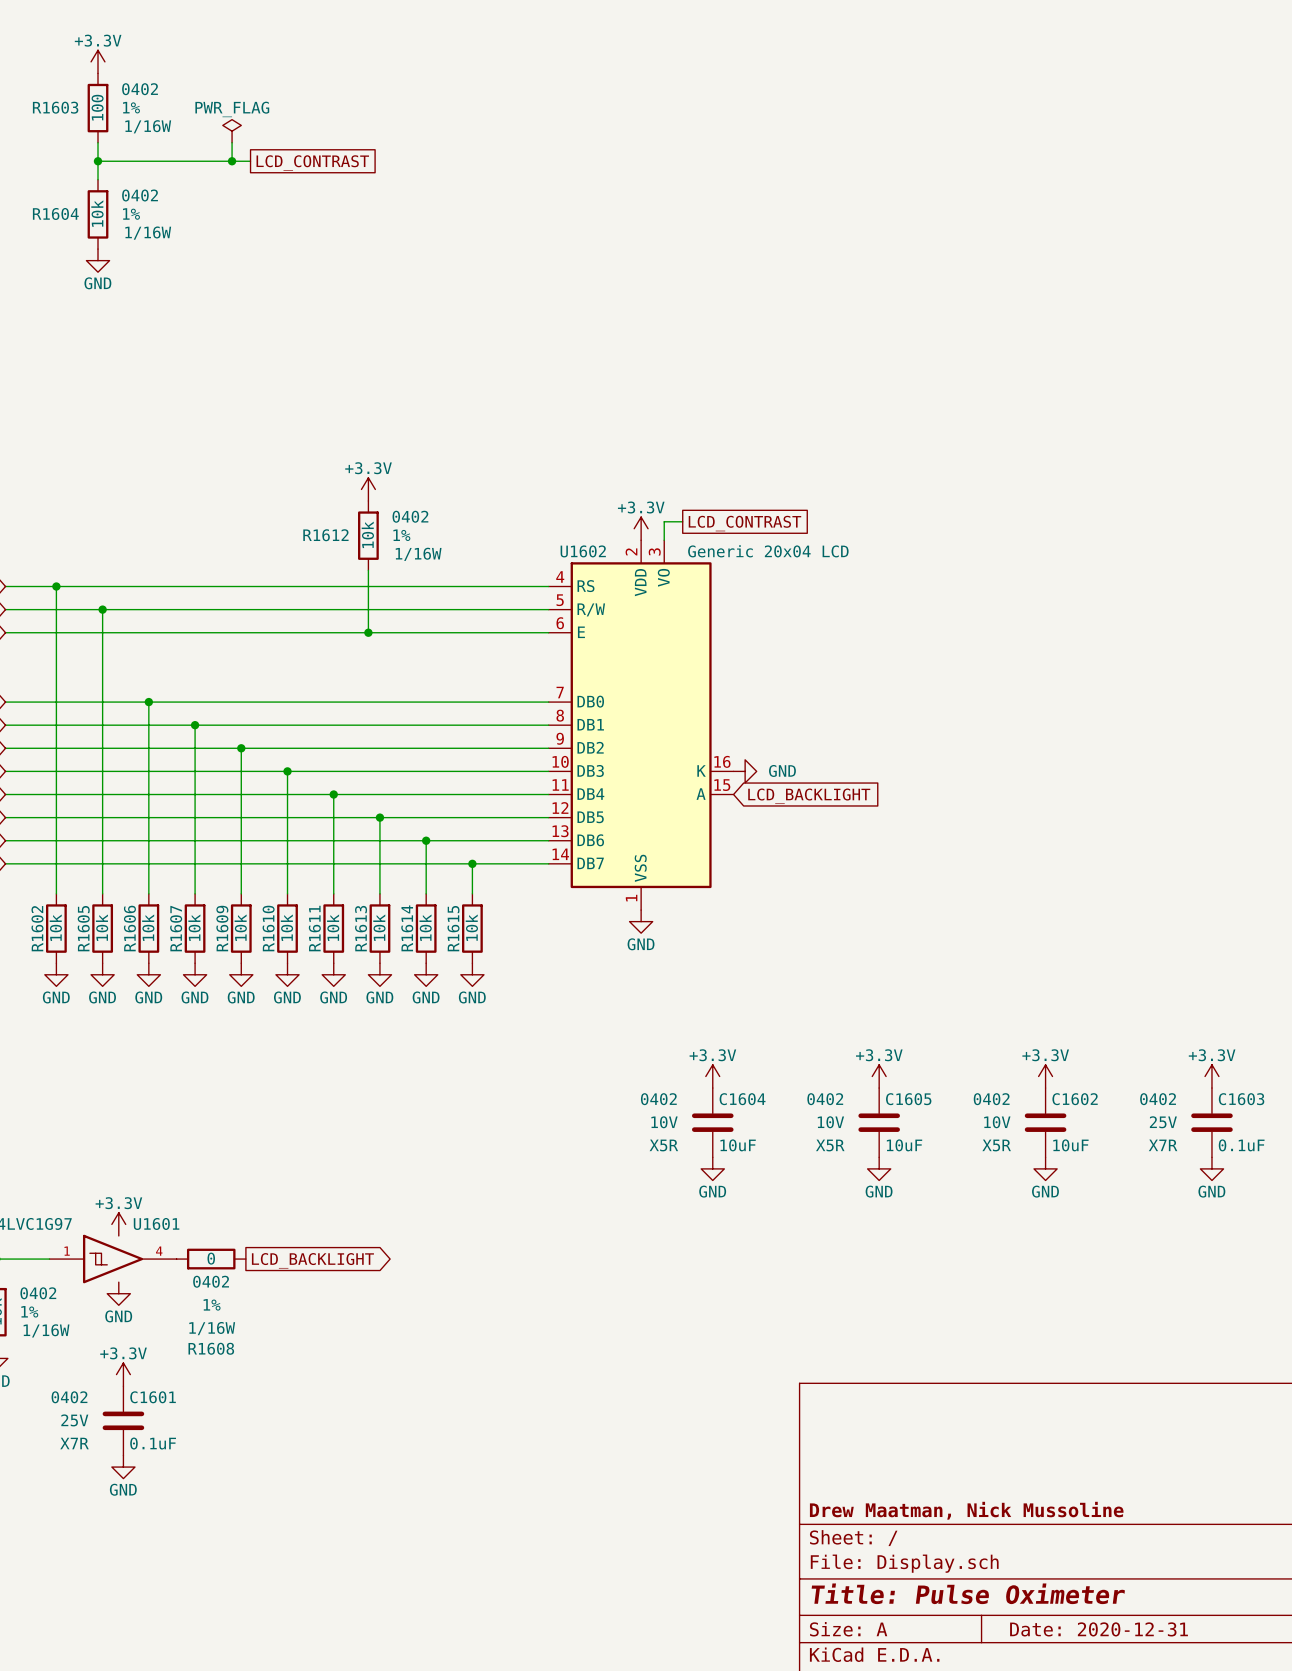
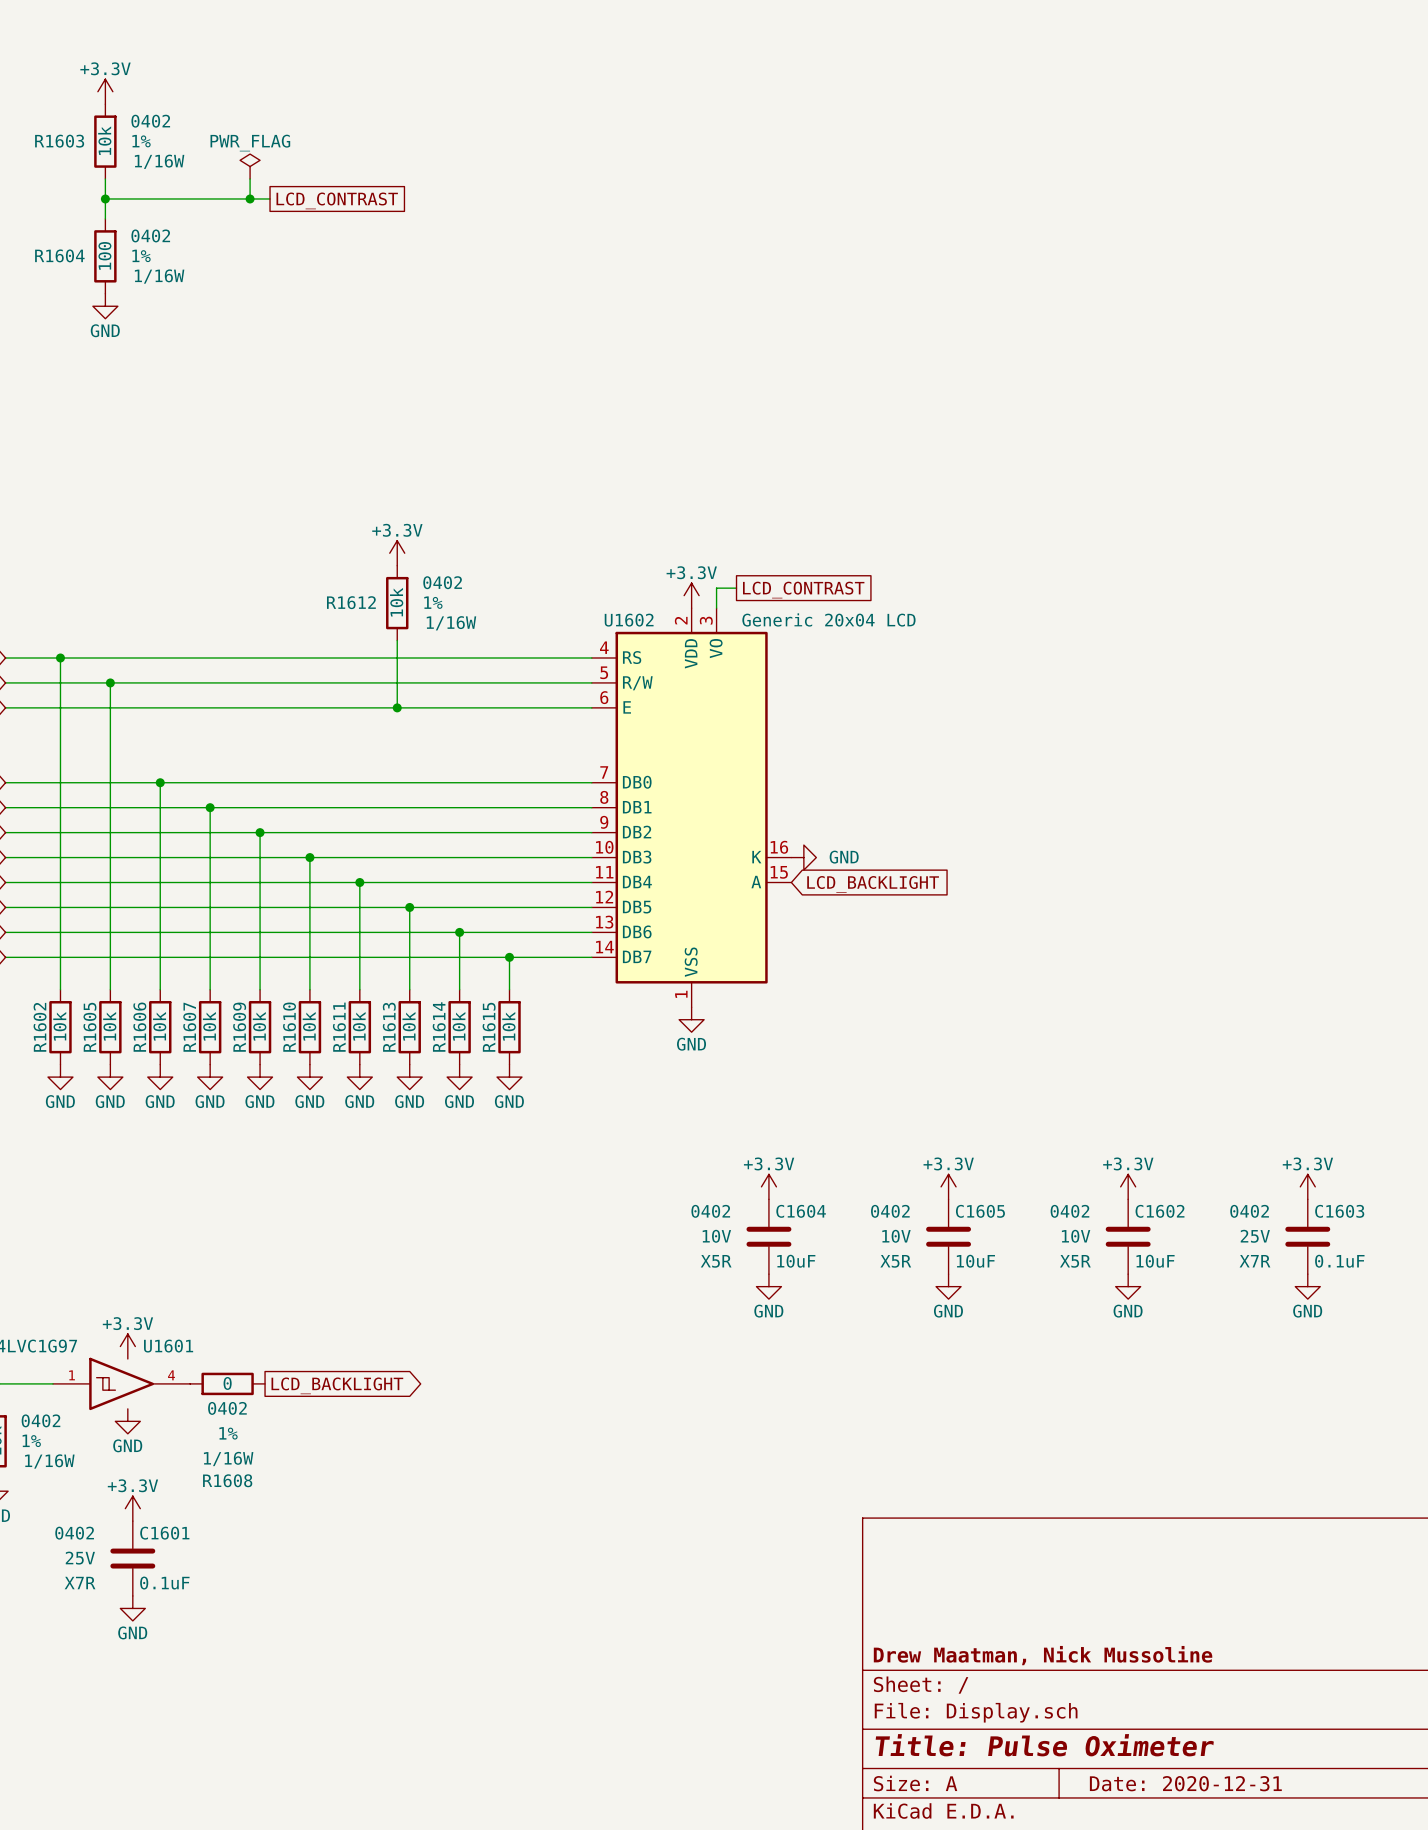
R1603 value: 100 (97, 107) -> 10k (104, 140)
R1604 value: 10k (97, 213) -> 100 (104, 255)

